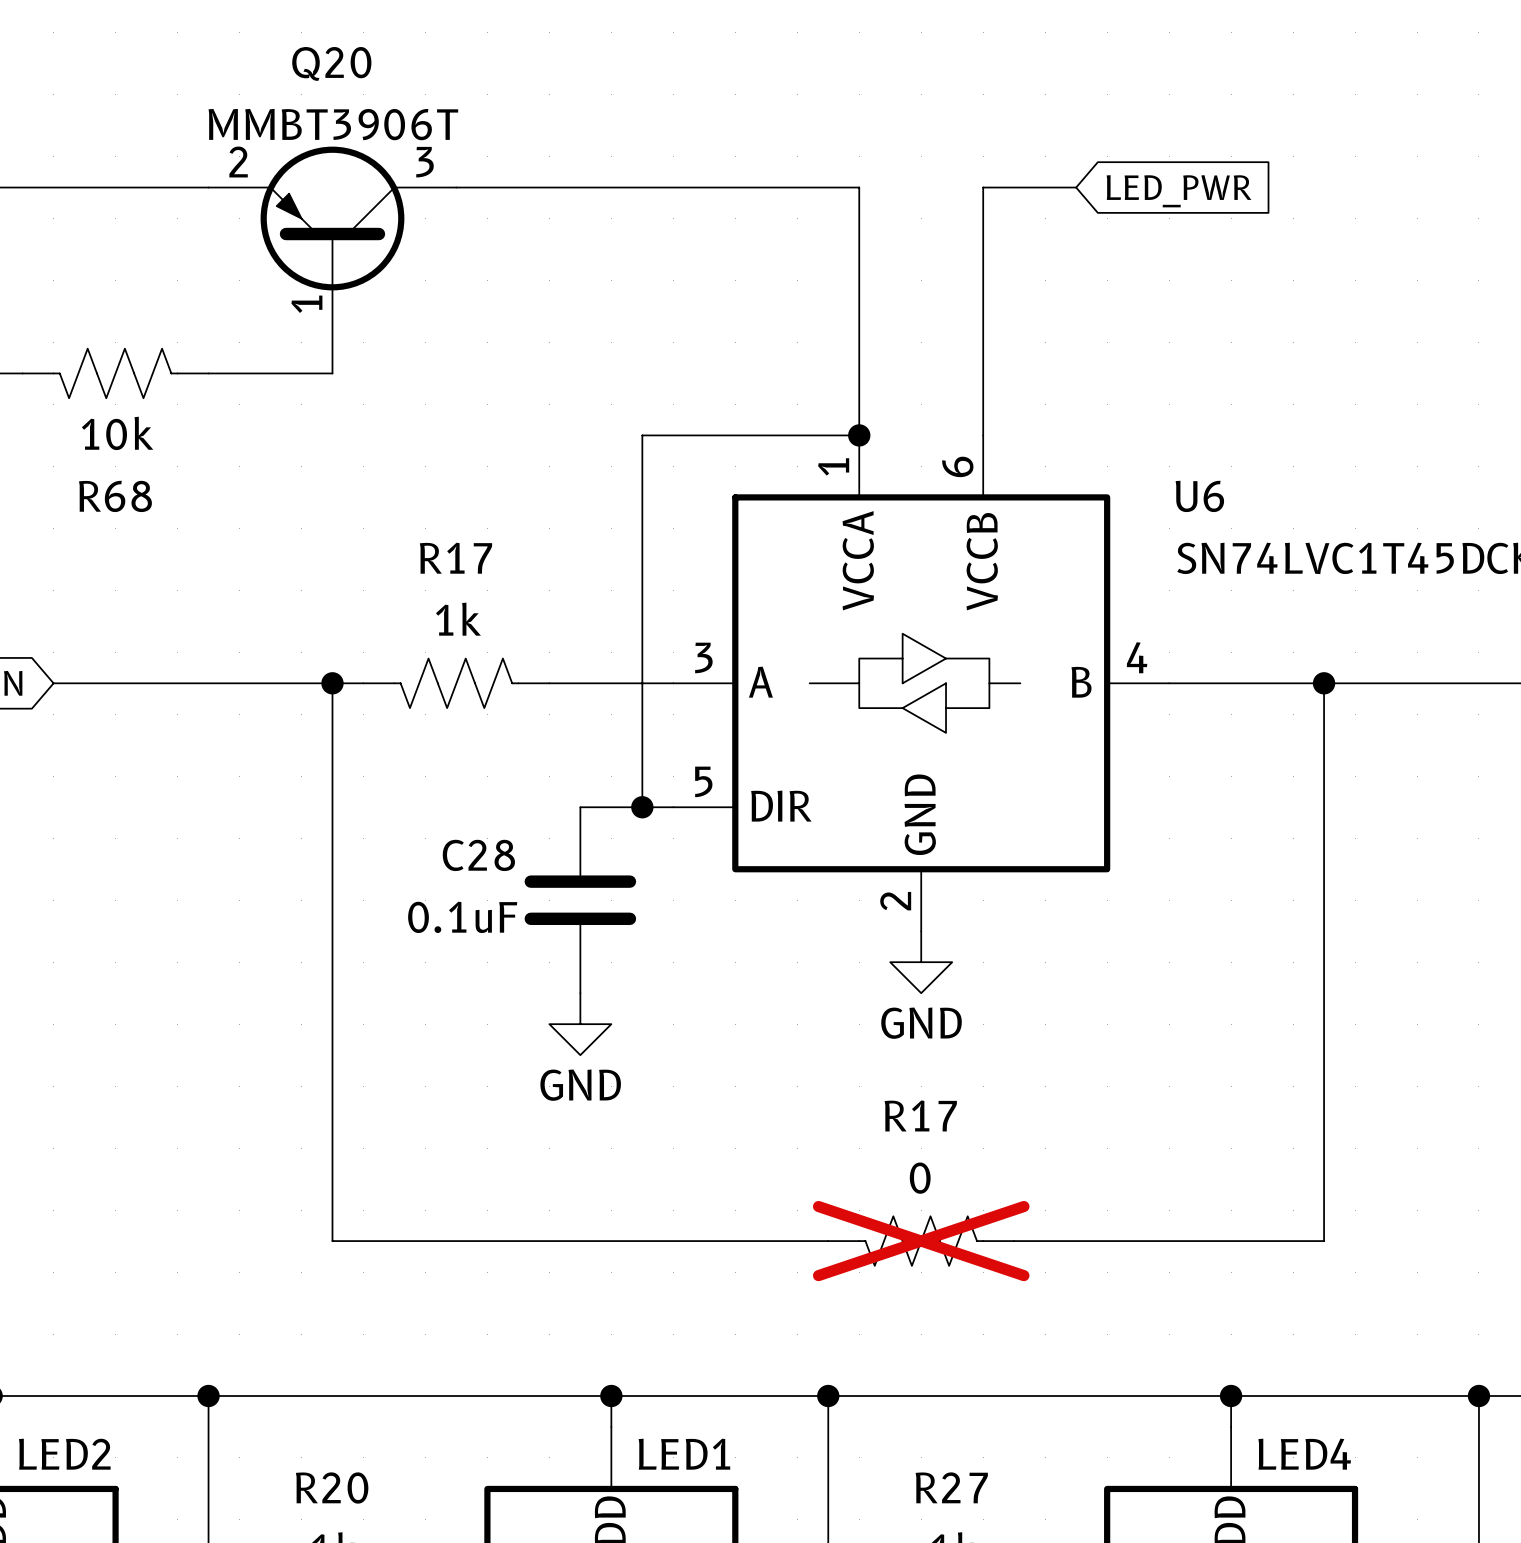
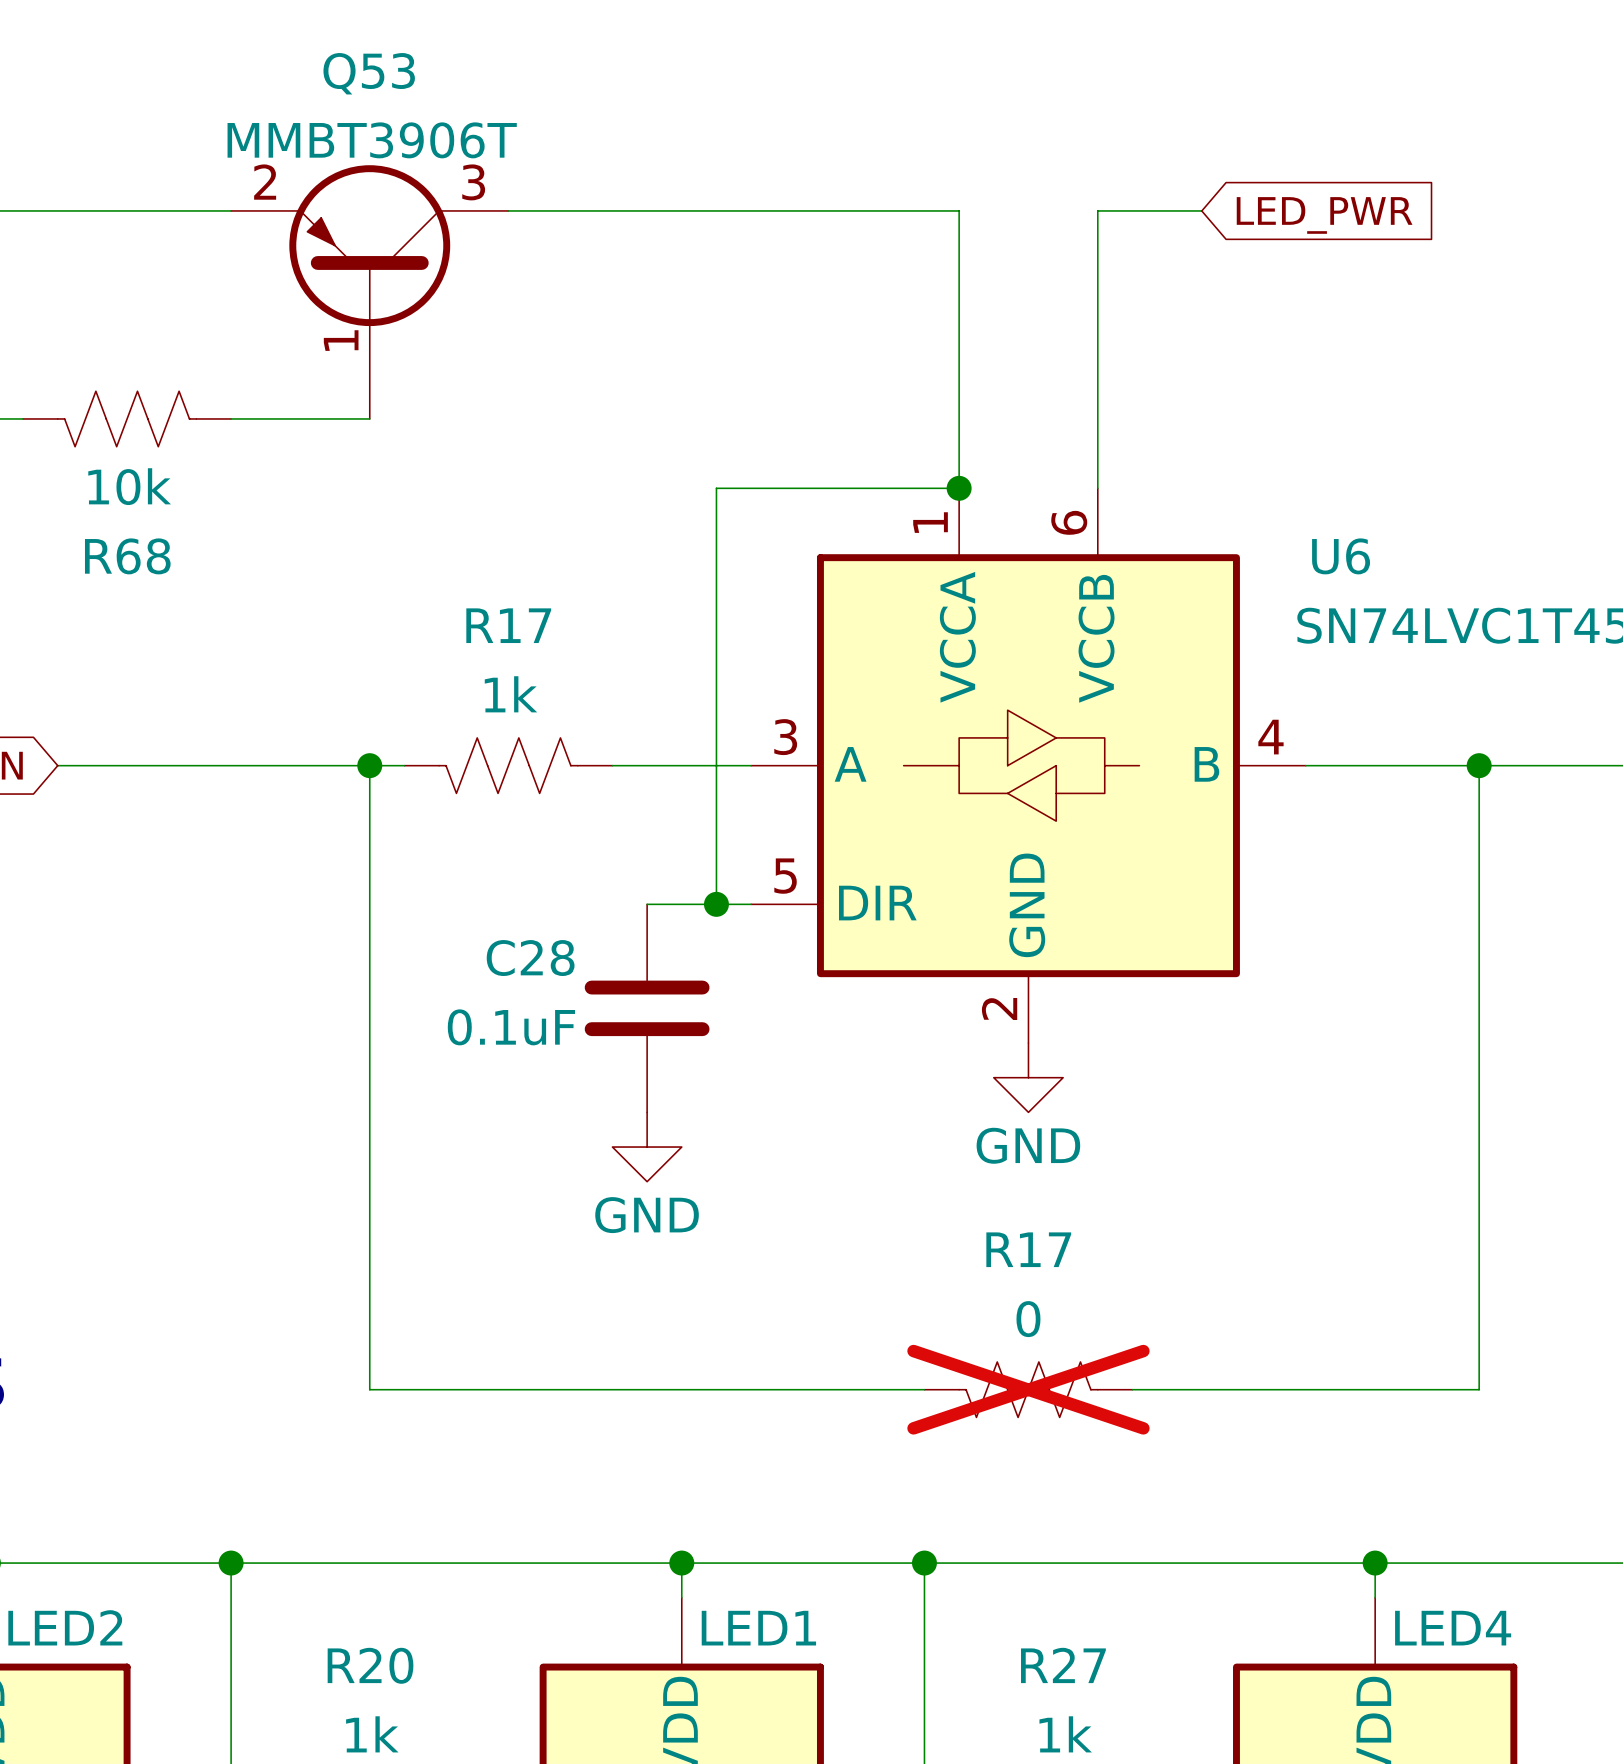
Q20 name: Q20 (331, 63) -> Q53 (369, 73)

